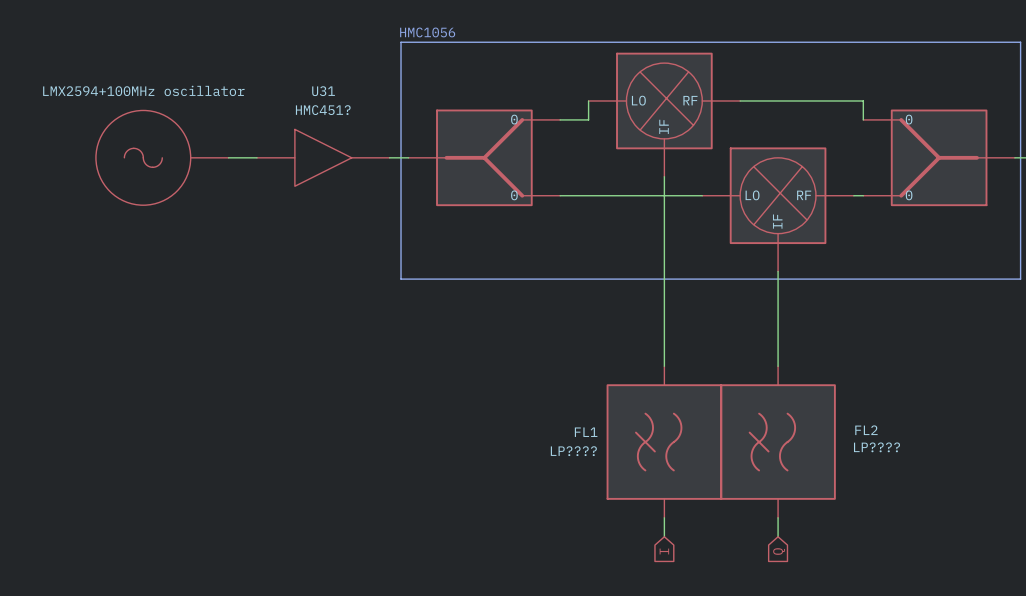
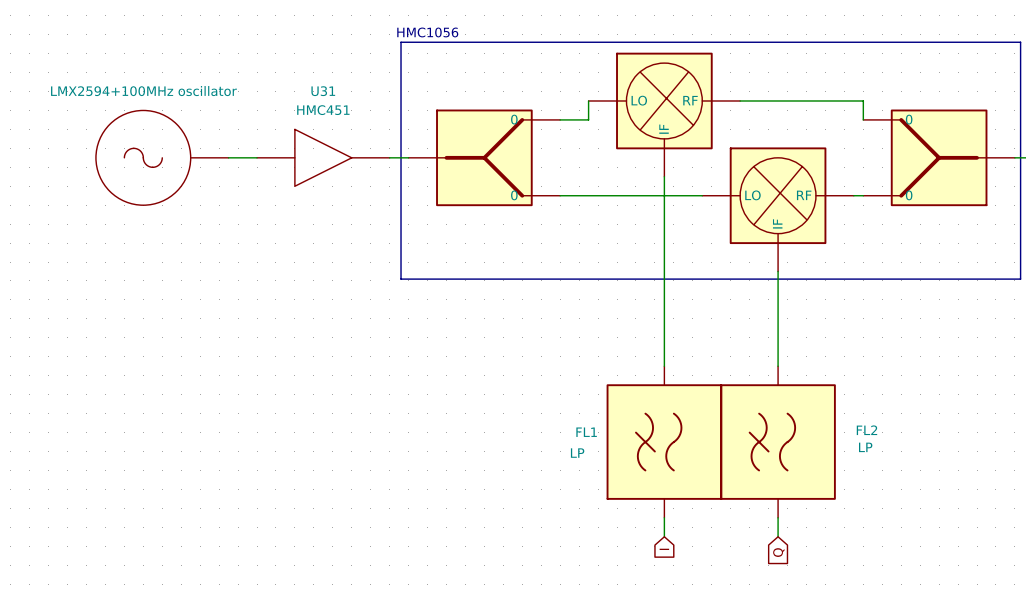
U31 value: HMC451? (323, 110) -> HMC451 (323, 110)
FL2 value: LP???? (876, 447) -> LP (865, 447)
FL1 value: LP???? (573, 451) -> LP (577, 453)

